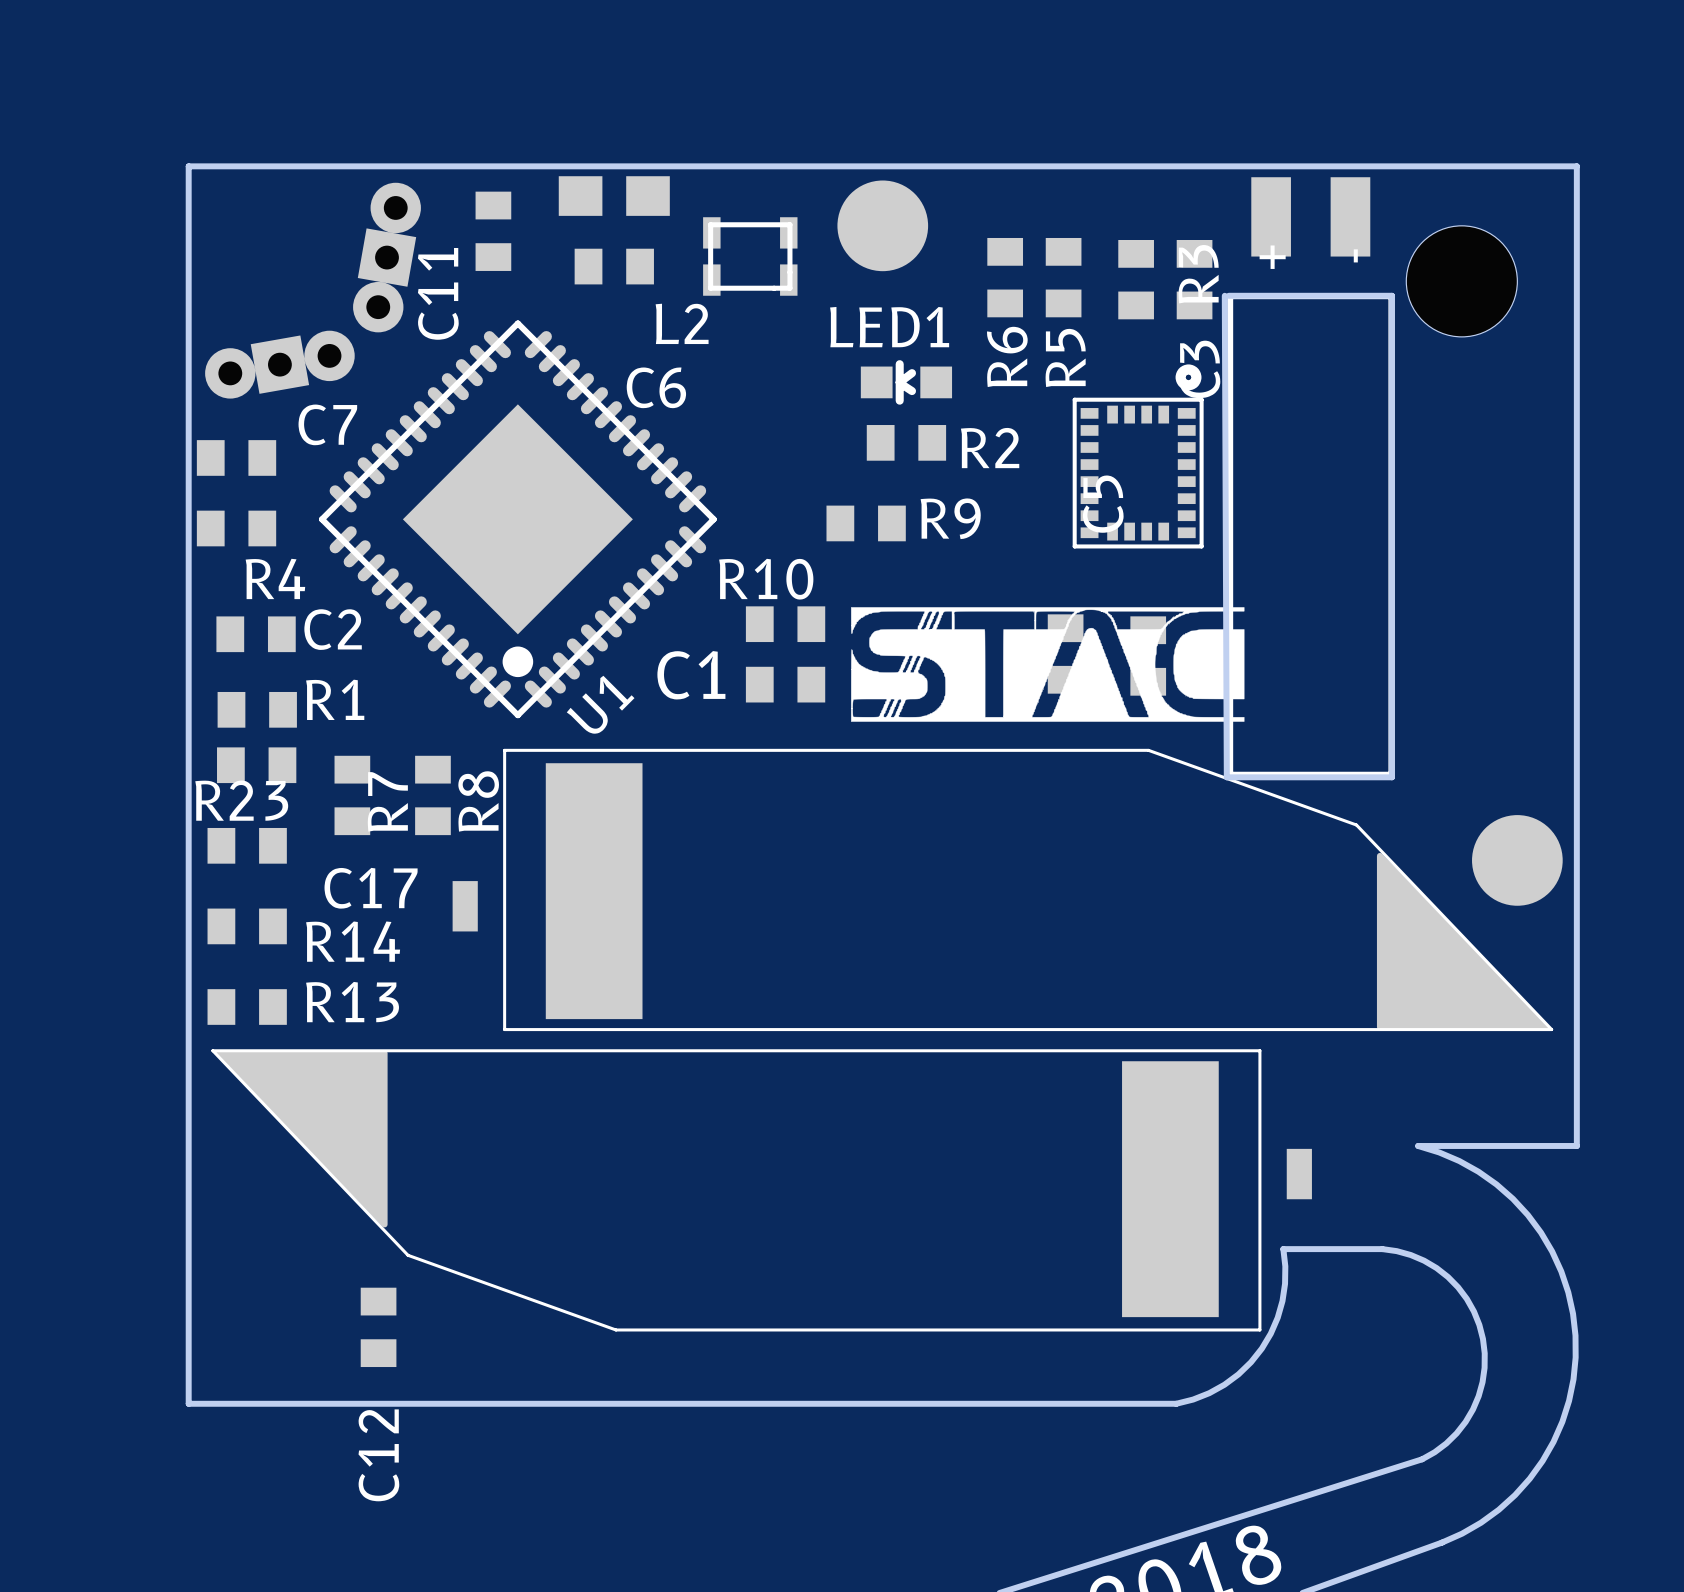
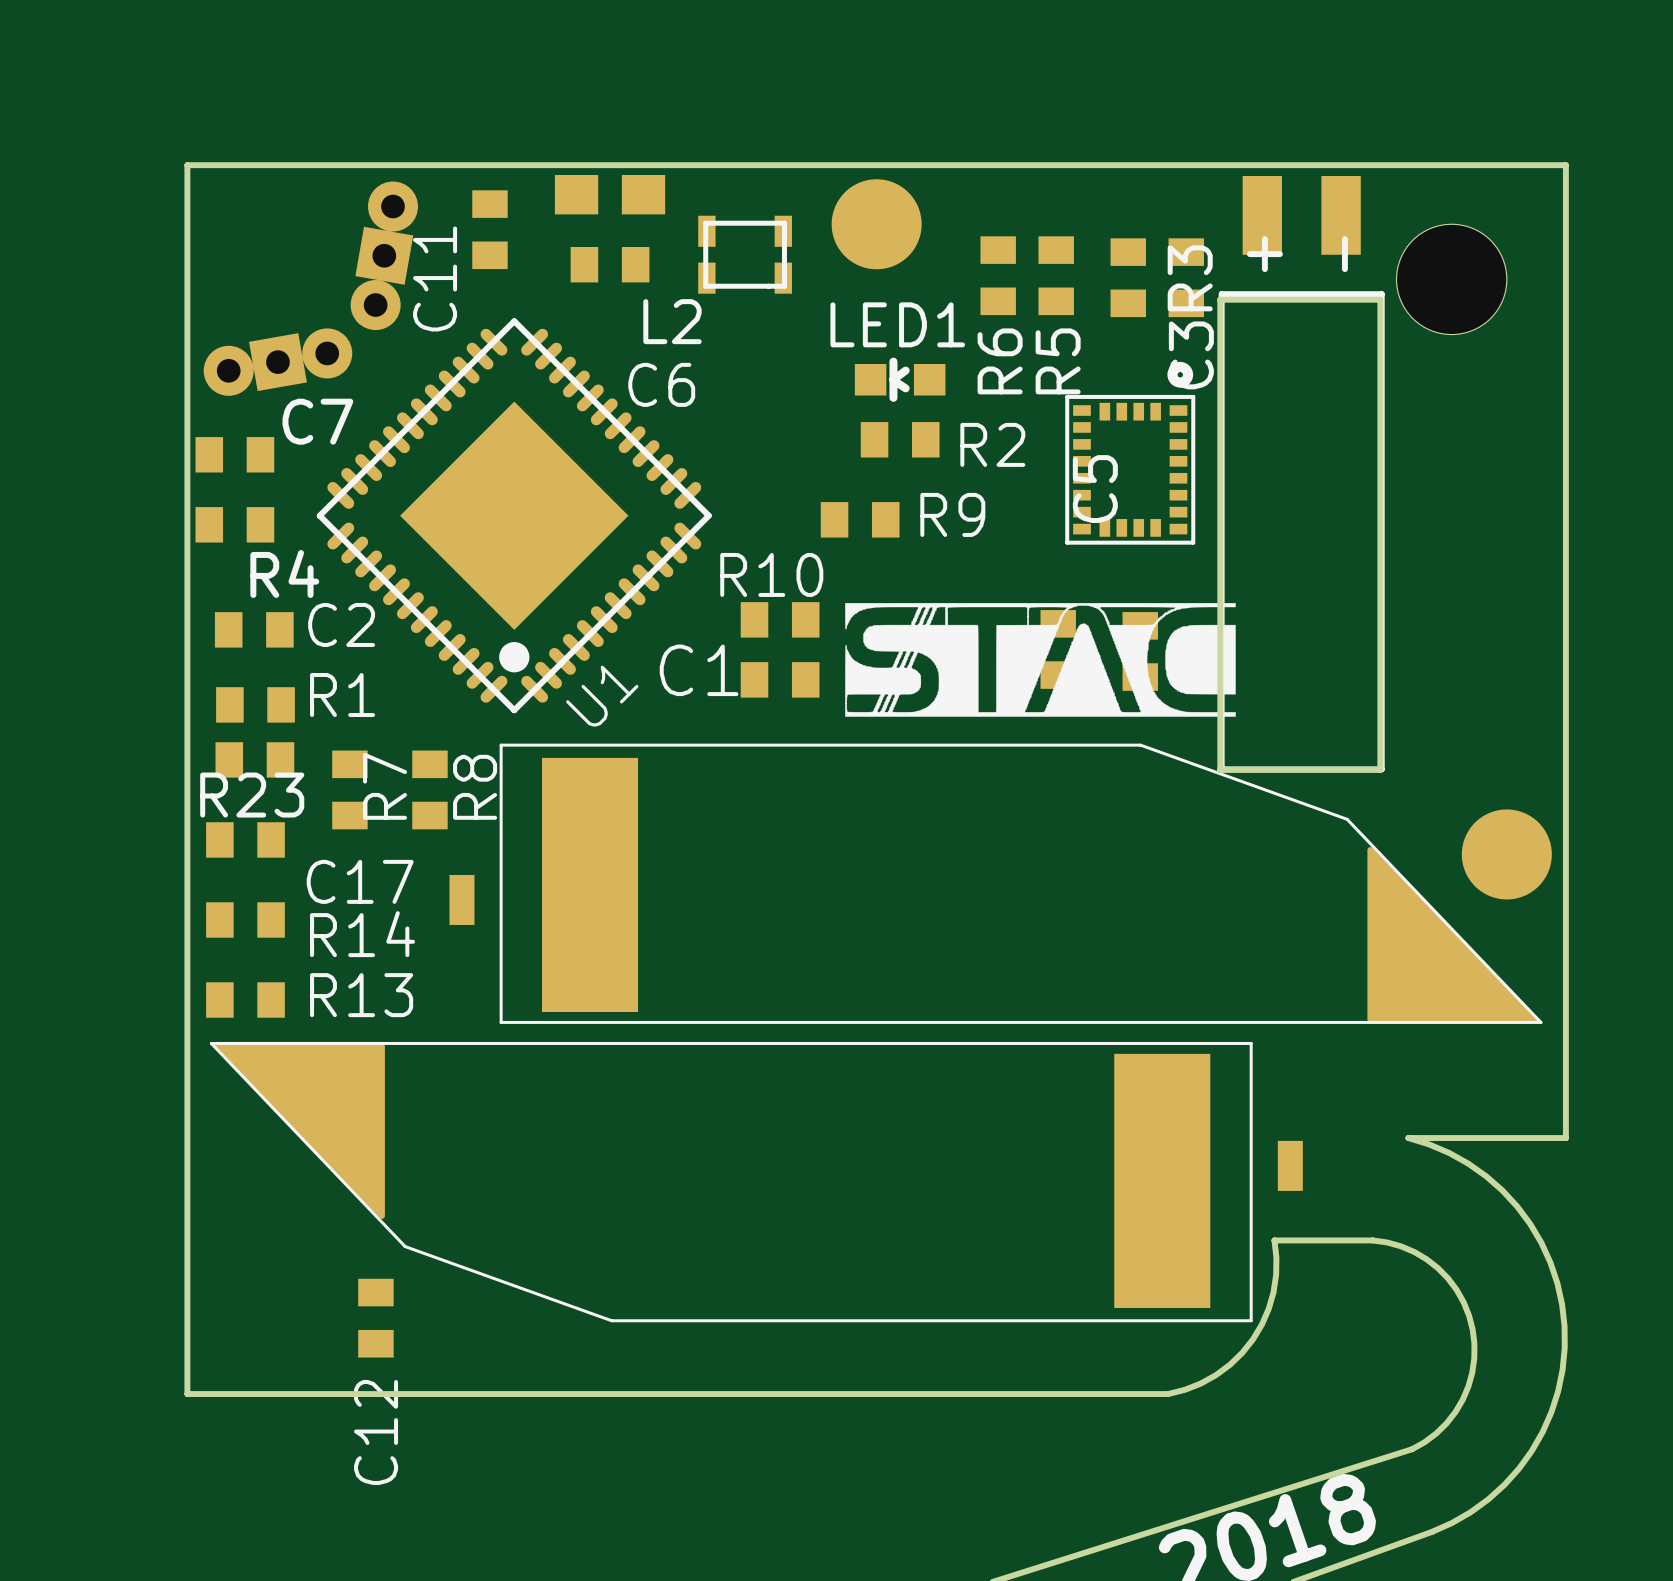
board edge: (1224, 295) (1226, 777) (1392, 777) (1392, 295) (1228, 295) -> none
board edge: none -> (1220, 299) (1220, 769) (1380, 769) (1380, 299) (1220, 299)

